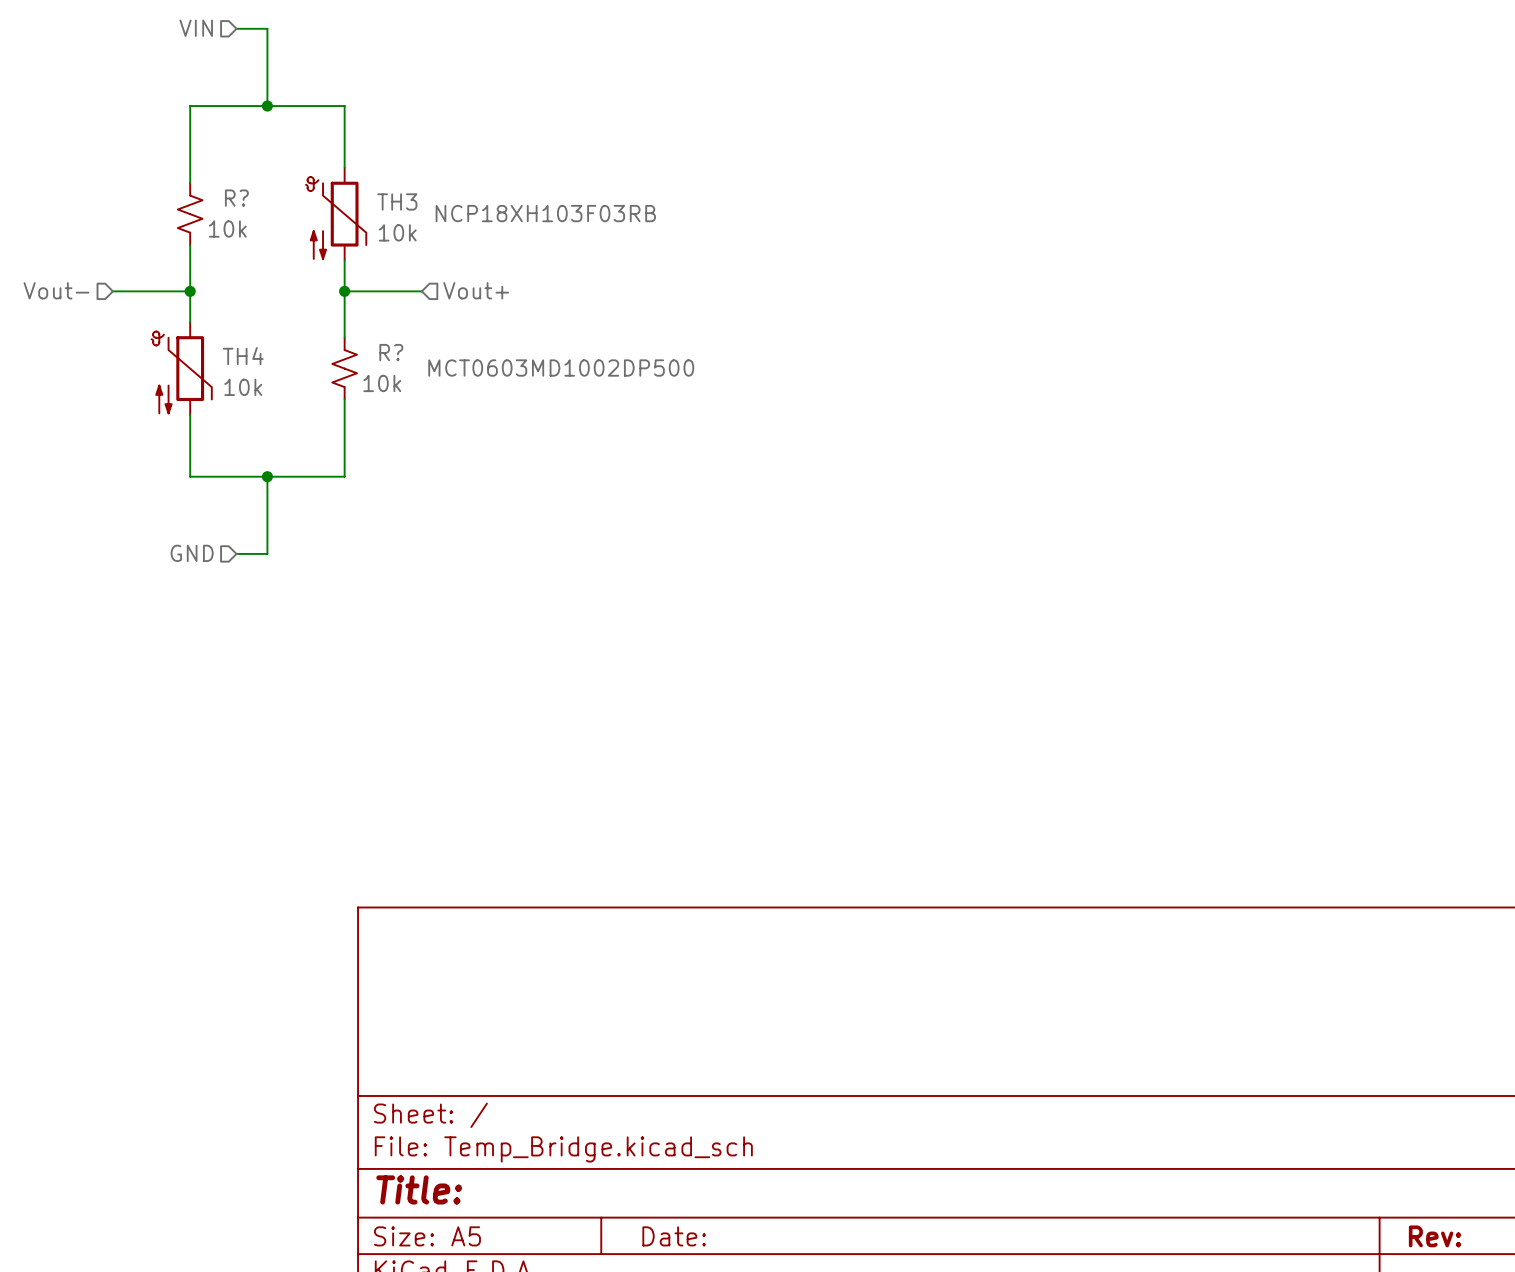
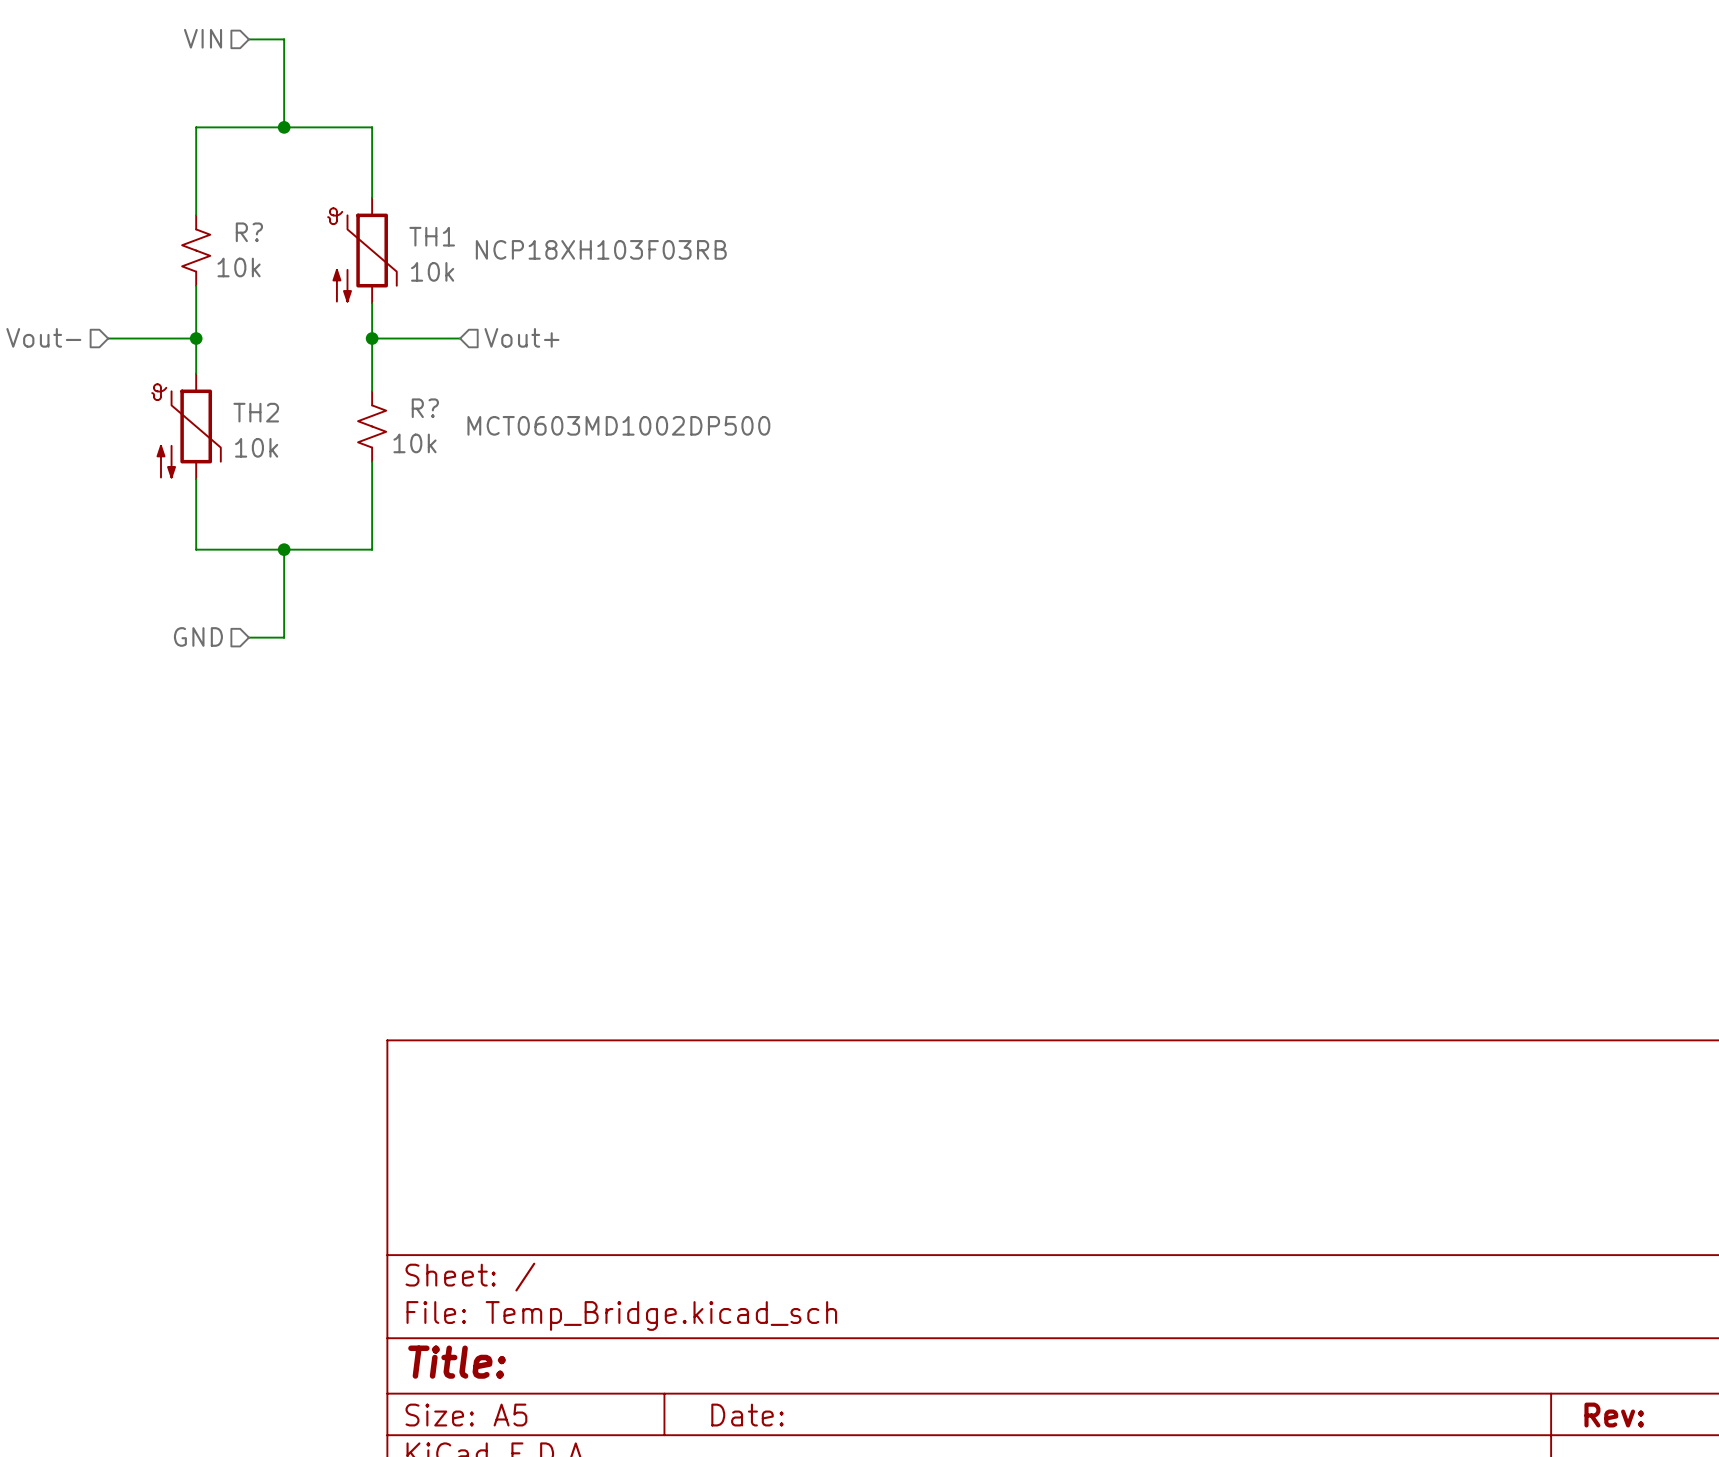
TH3 name: TH3 (397, 201) -> TH1 (432, 236)
TH4 name: TH4 (243, 356) -> TH2 (256, 412)

